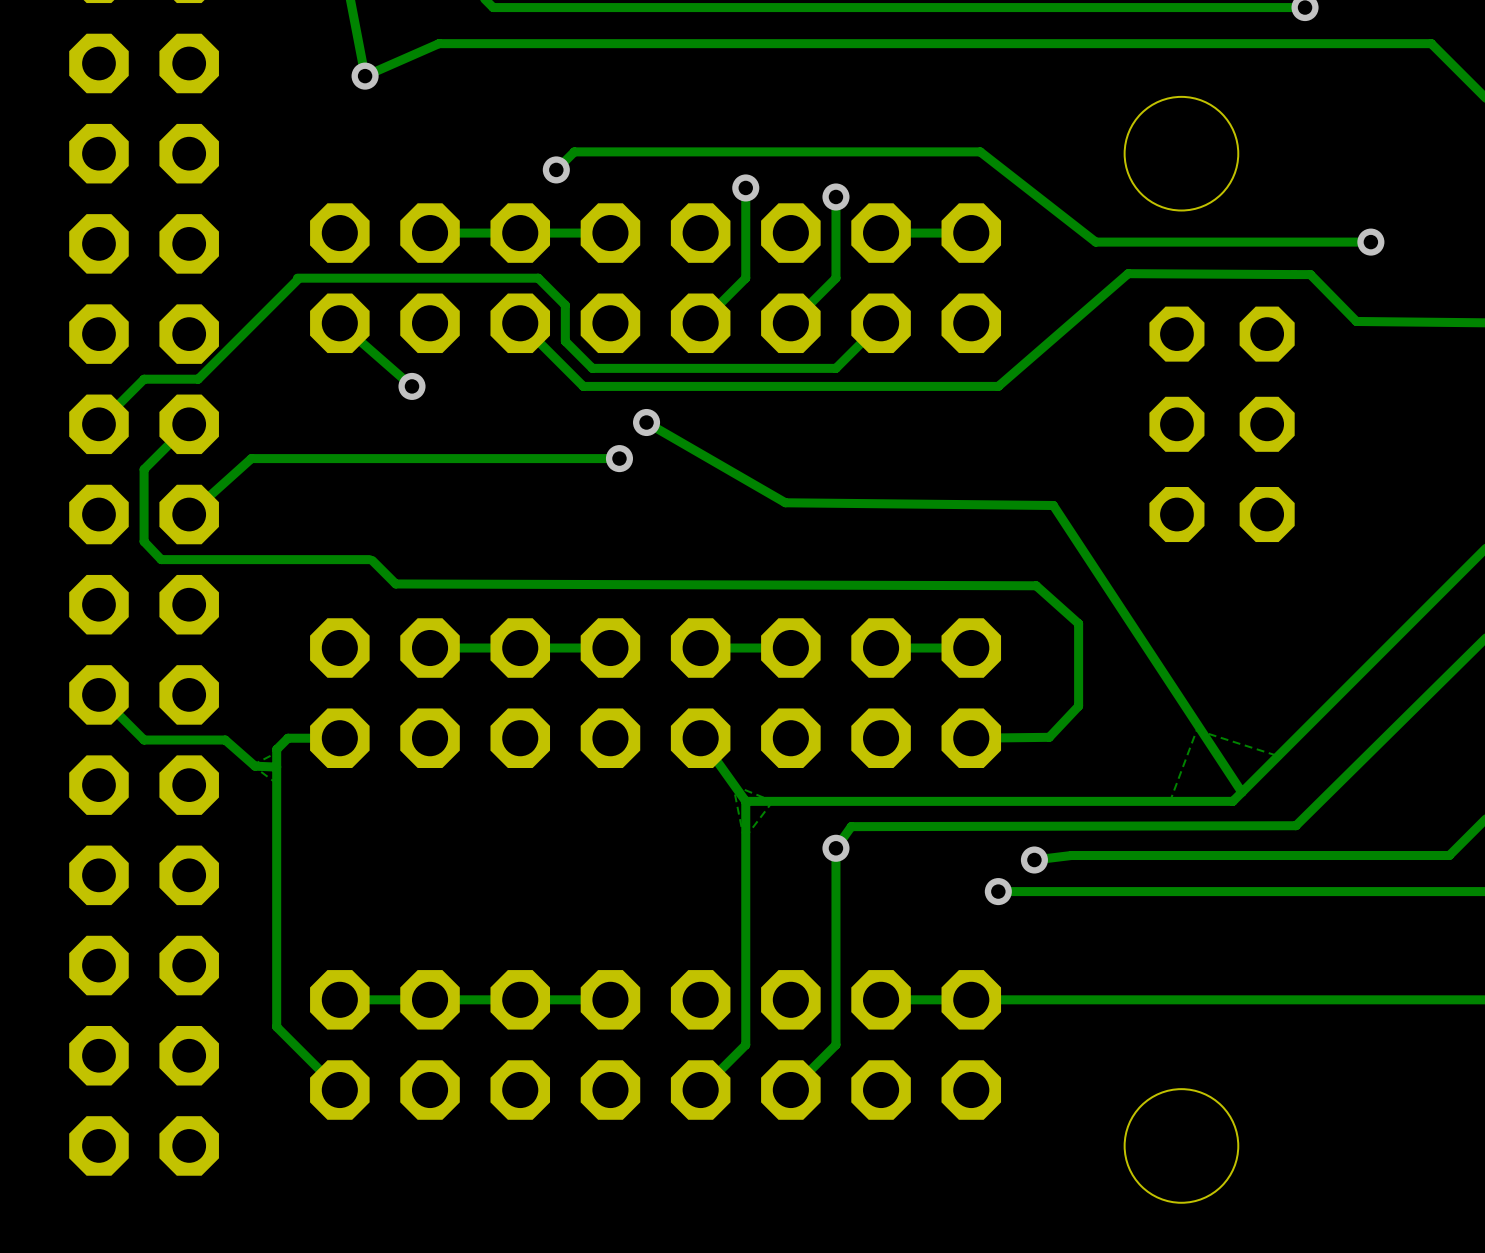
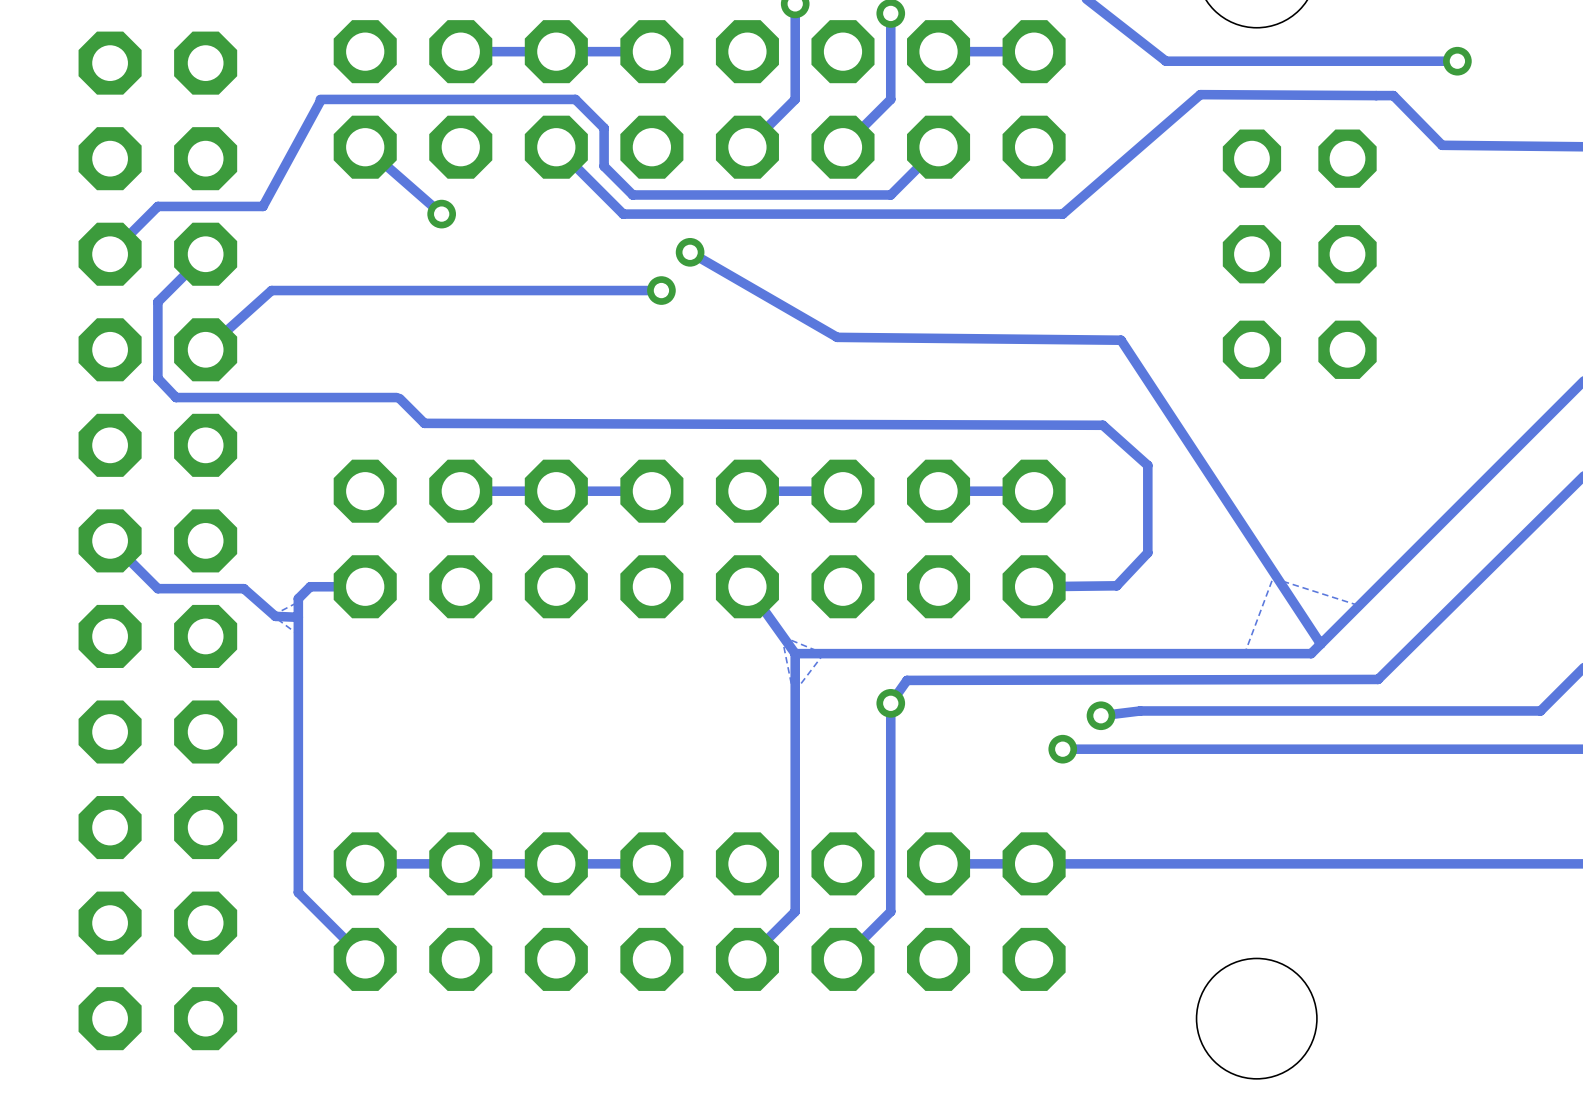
track: (297, 279) (198, 379) -> (320, 101) (262, 206) (215, 206)

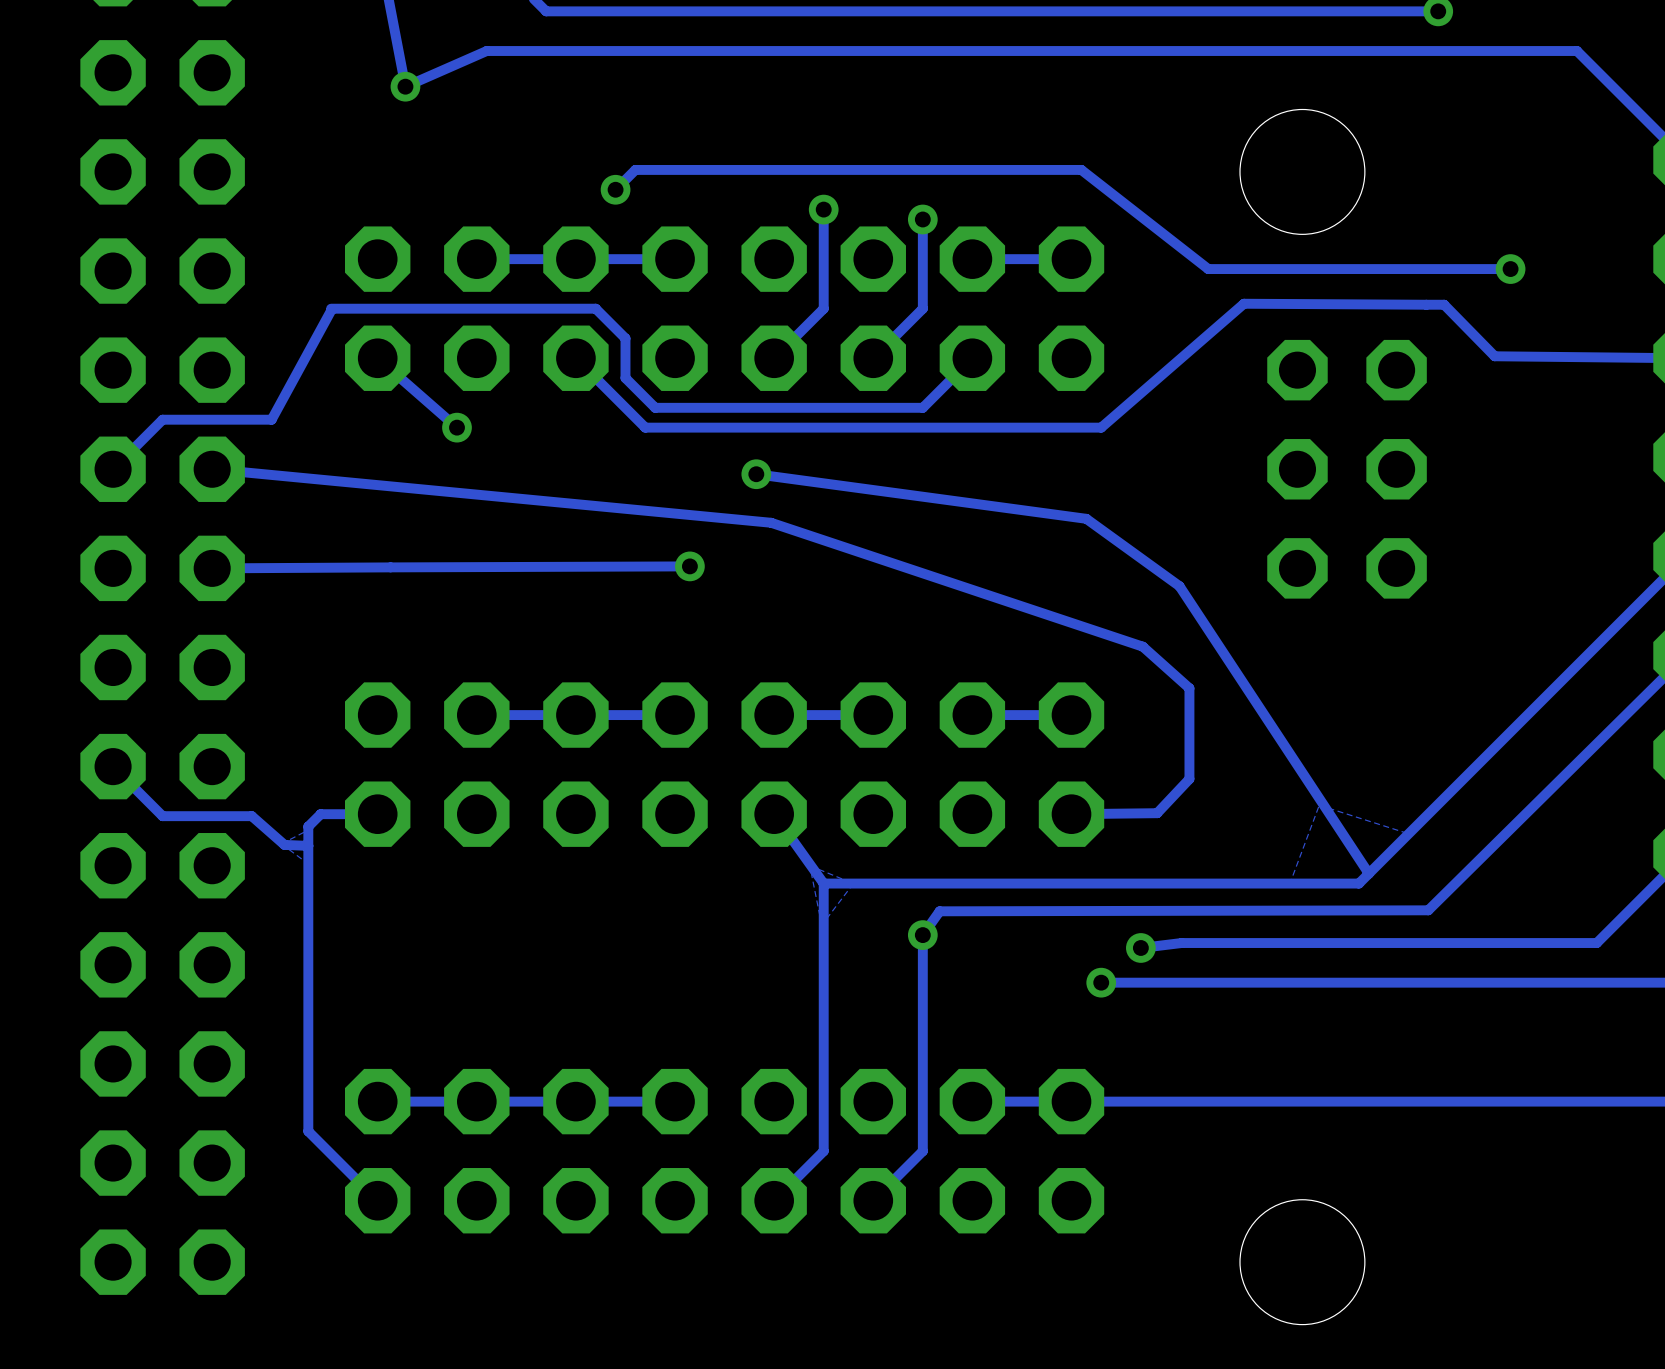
track: (690, 252) (837, 337) (1121, 340) (1320, 644) -> (756, 474) (1086, 518) (1179, 586) (1368, 873)
via: (690, 252) -> none
track: (205, 254) (157, 302) (157, 378) (176, 397) (396, 397) (424, 423) (1102, 425) -> (212, 469) (771, 522) (1142, 646)
via: none -> (756, 474)
track: (661, 290) (271, 290) (205, 349) -> (689, 566) (212, 568)
via: (661, 290) -> none
via: none -> (689, 566)

